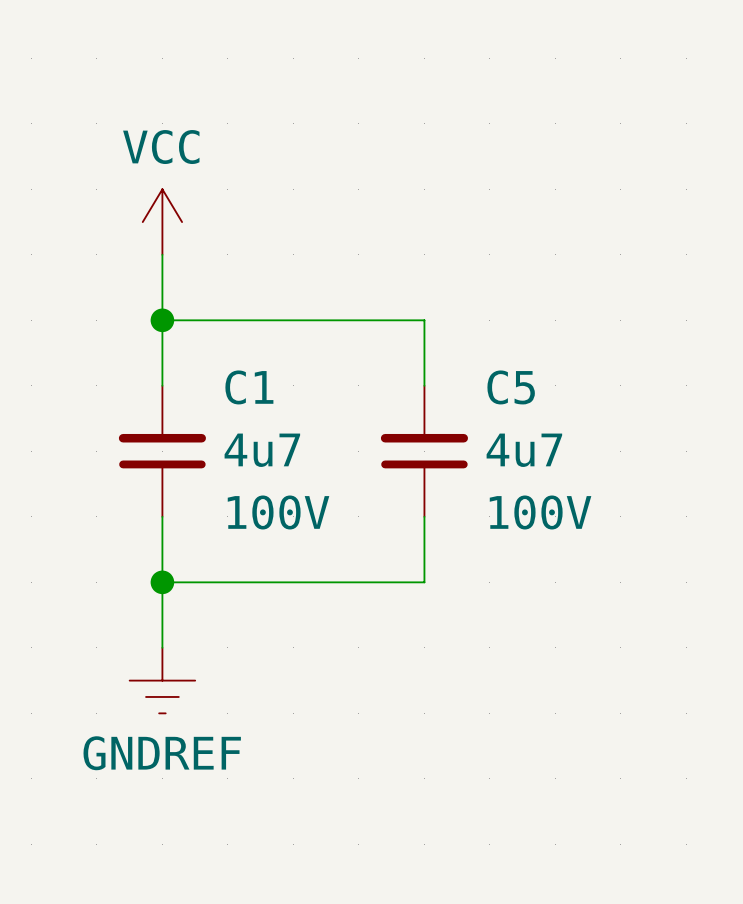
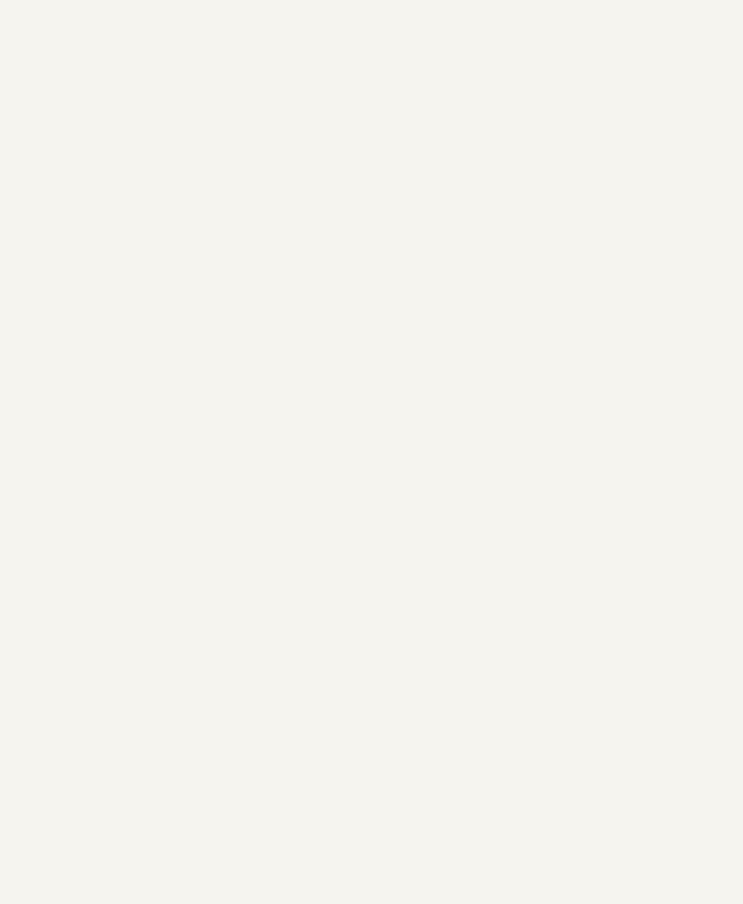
power symbol: VCC (162, 222) -> none
wire: (162, 254) (162, 385) -> none
wire: (162, 320) (424, 320) (424, 385) -> none
junction: (162, 320) -> none
C1: 4u7 (162, 451) -> none
C5: 4u7 (424, 451) -> none
wire: (162, 516) (162, 647) -> none
wire: (424, 516) (424, 582) (162, 582) -> none
junction: (162, 582) -> none
power symbol: GNDREF (162, 680) -> none

